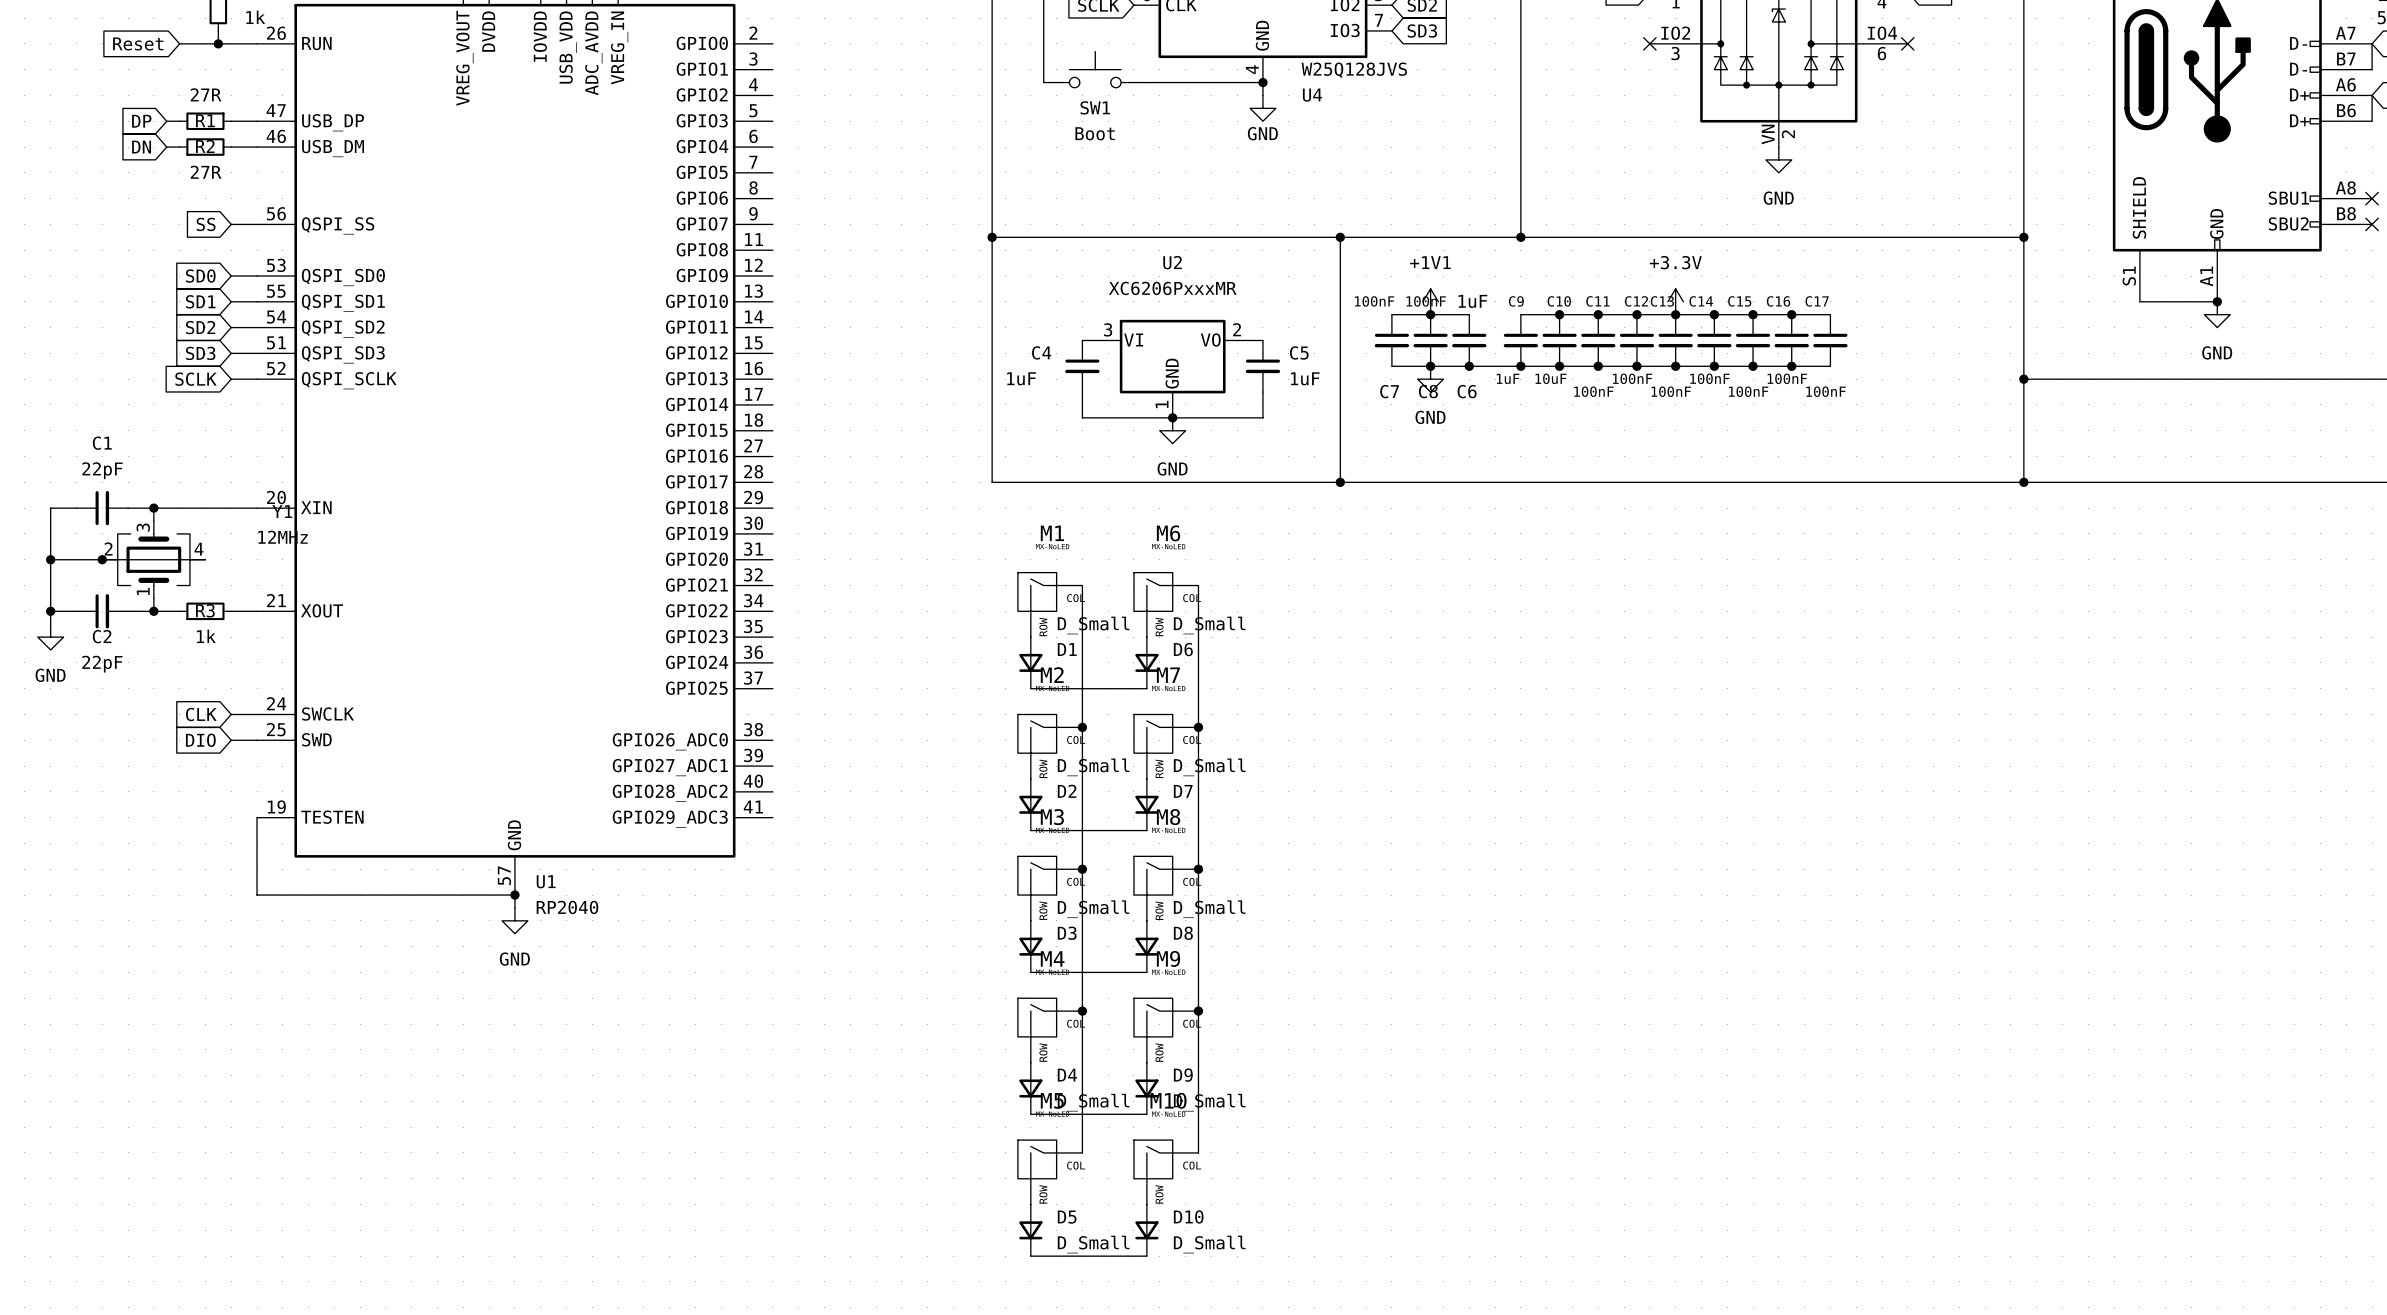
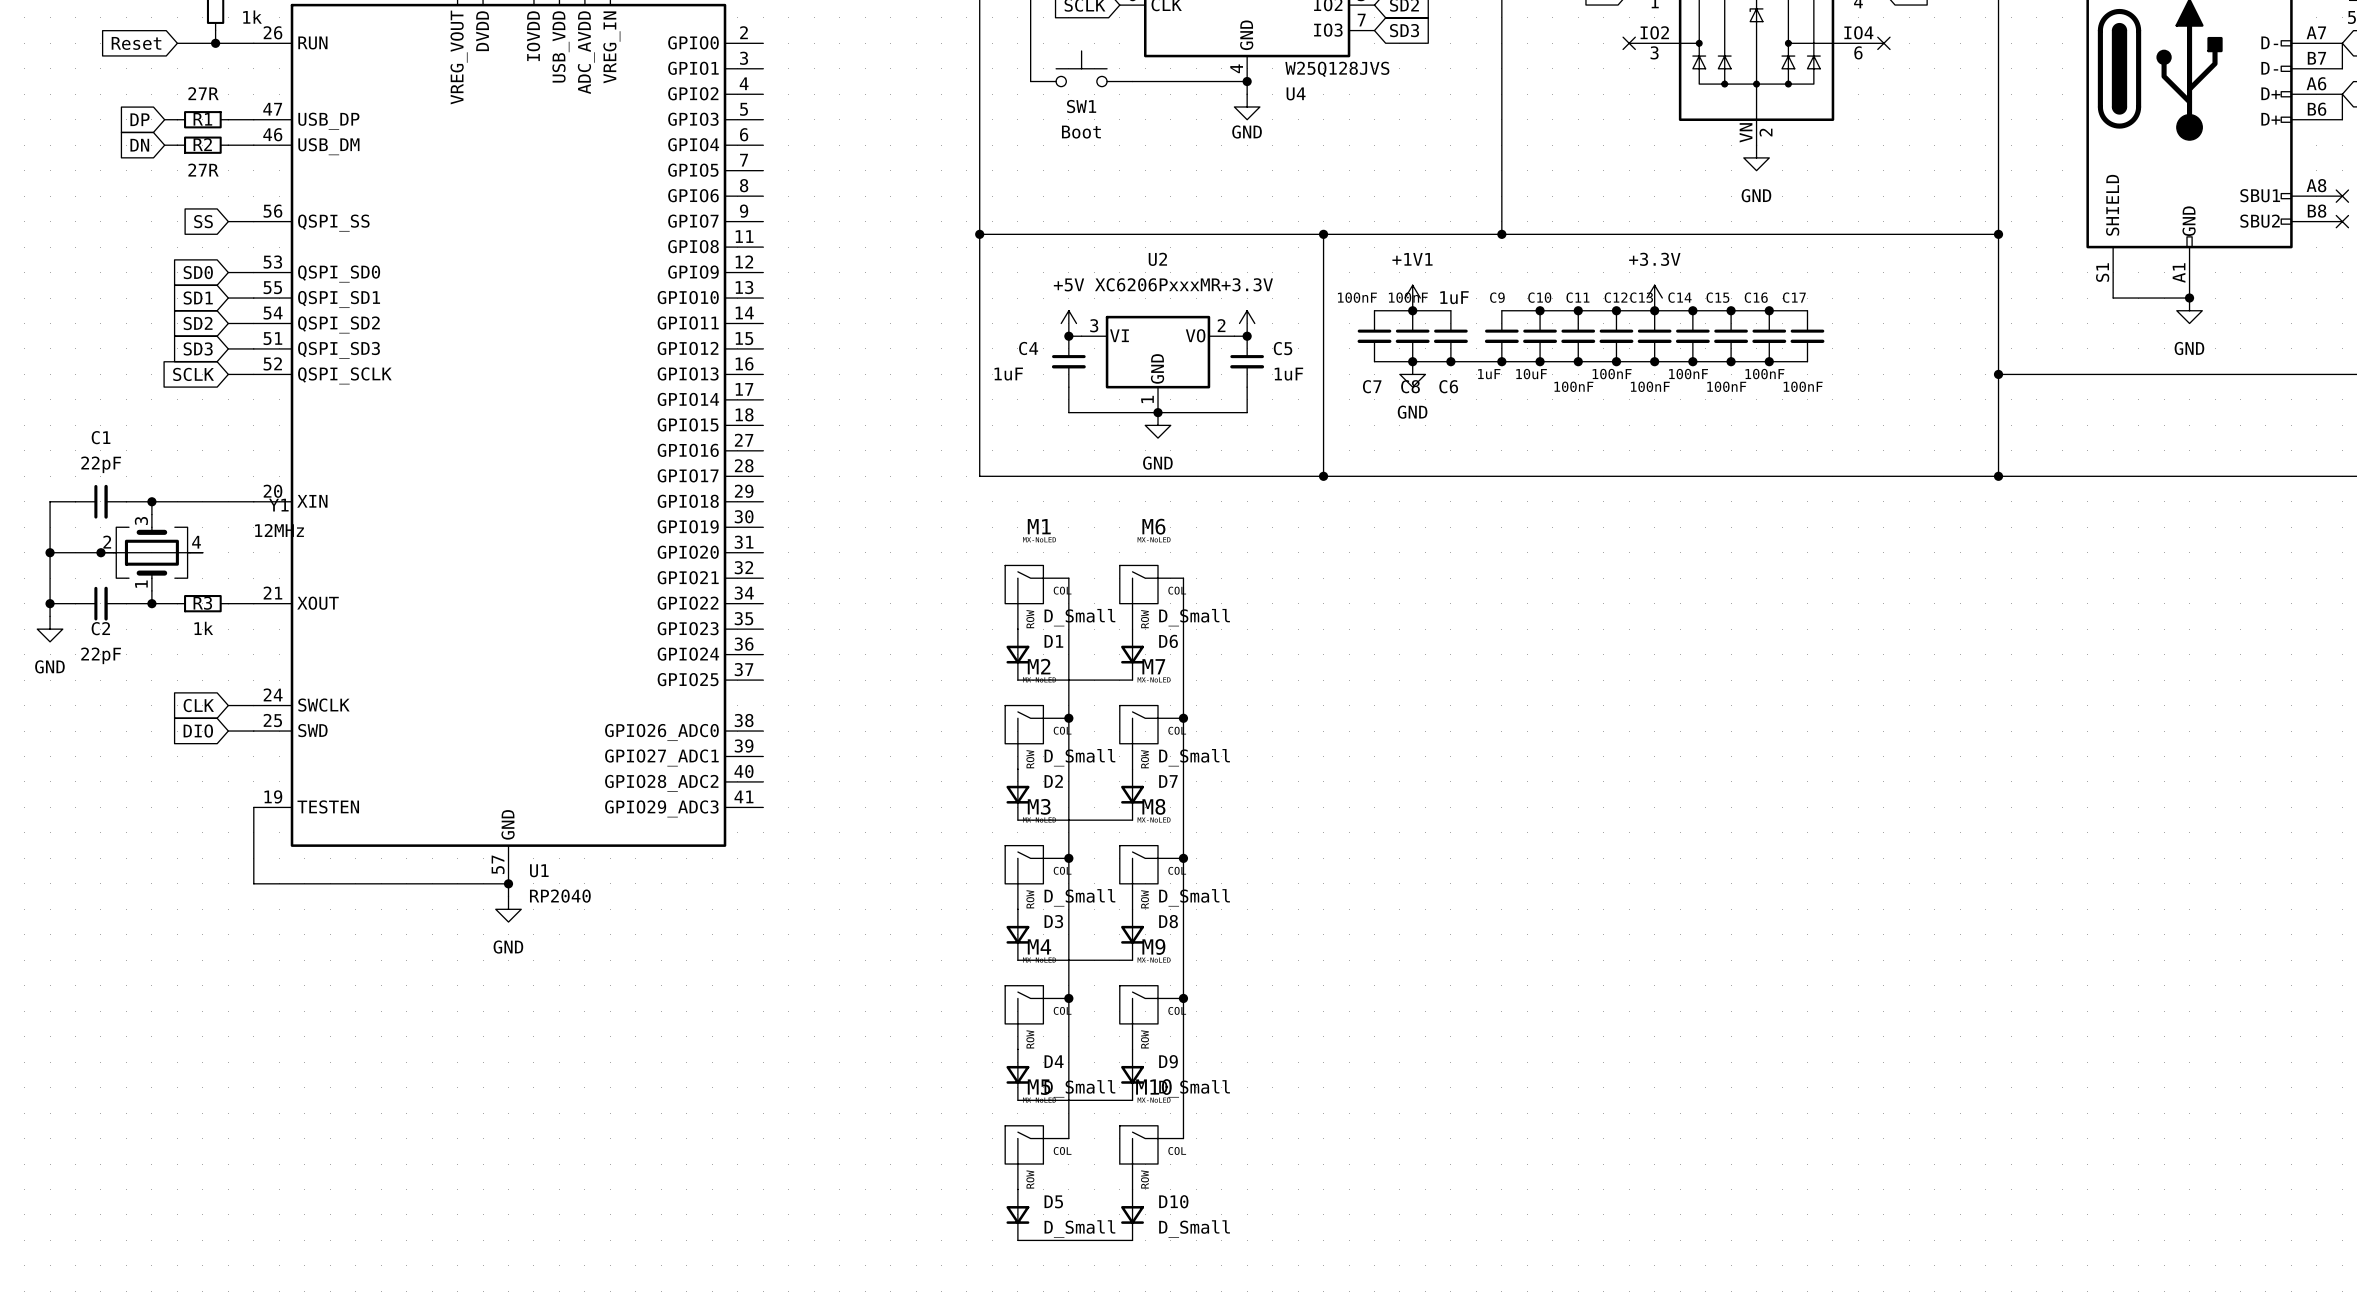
power symbol: none -> +5V (1068, 323)
power symbol: none -> +3.3V (1247, 323)
junction: none -> (1068, 336)
junction: none -> (1247, 336)

